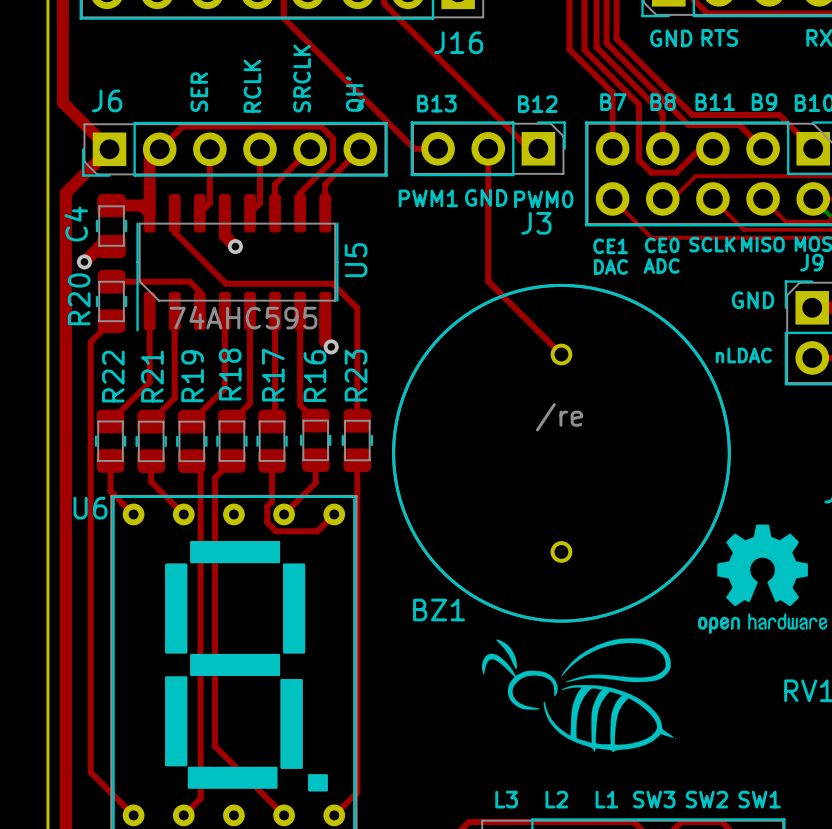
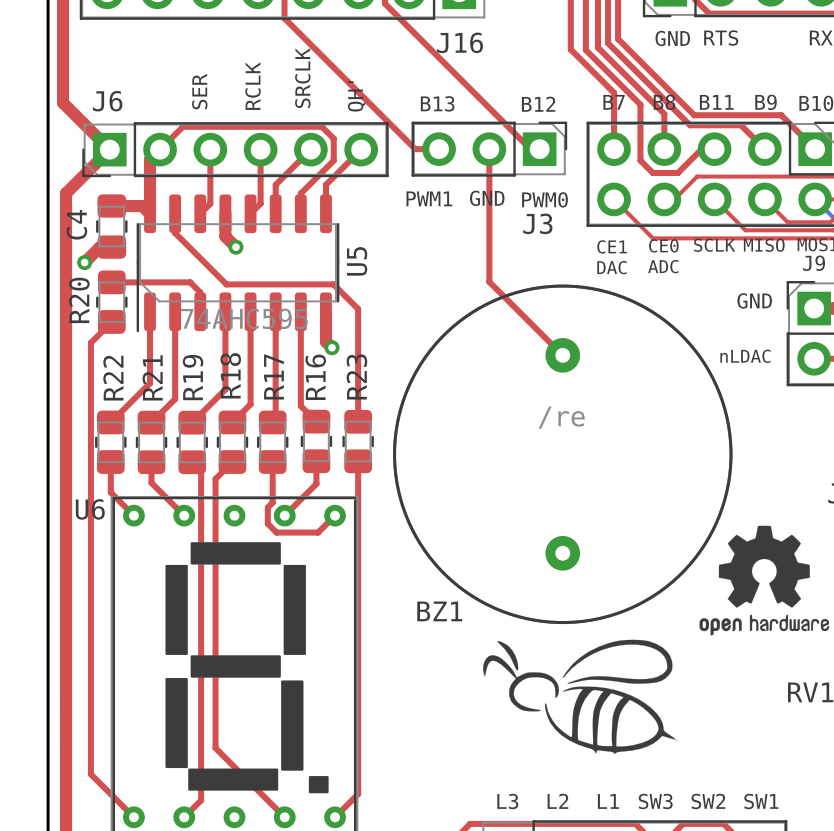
BZ1 footprint: [392, 283, 731, 623] -> [393, 284, 733, 625]

